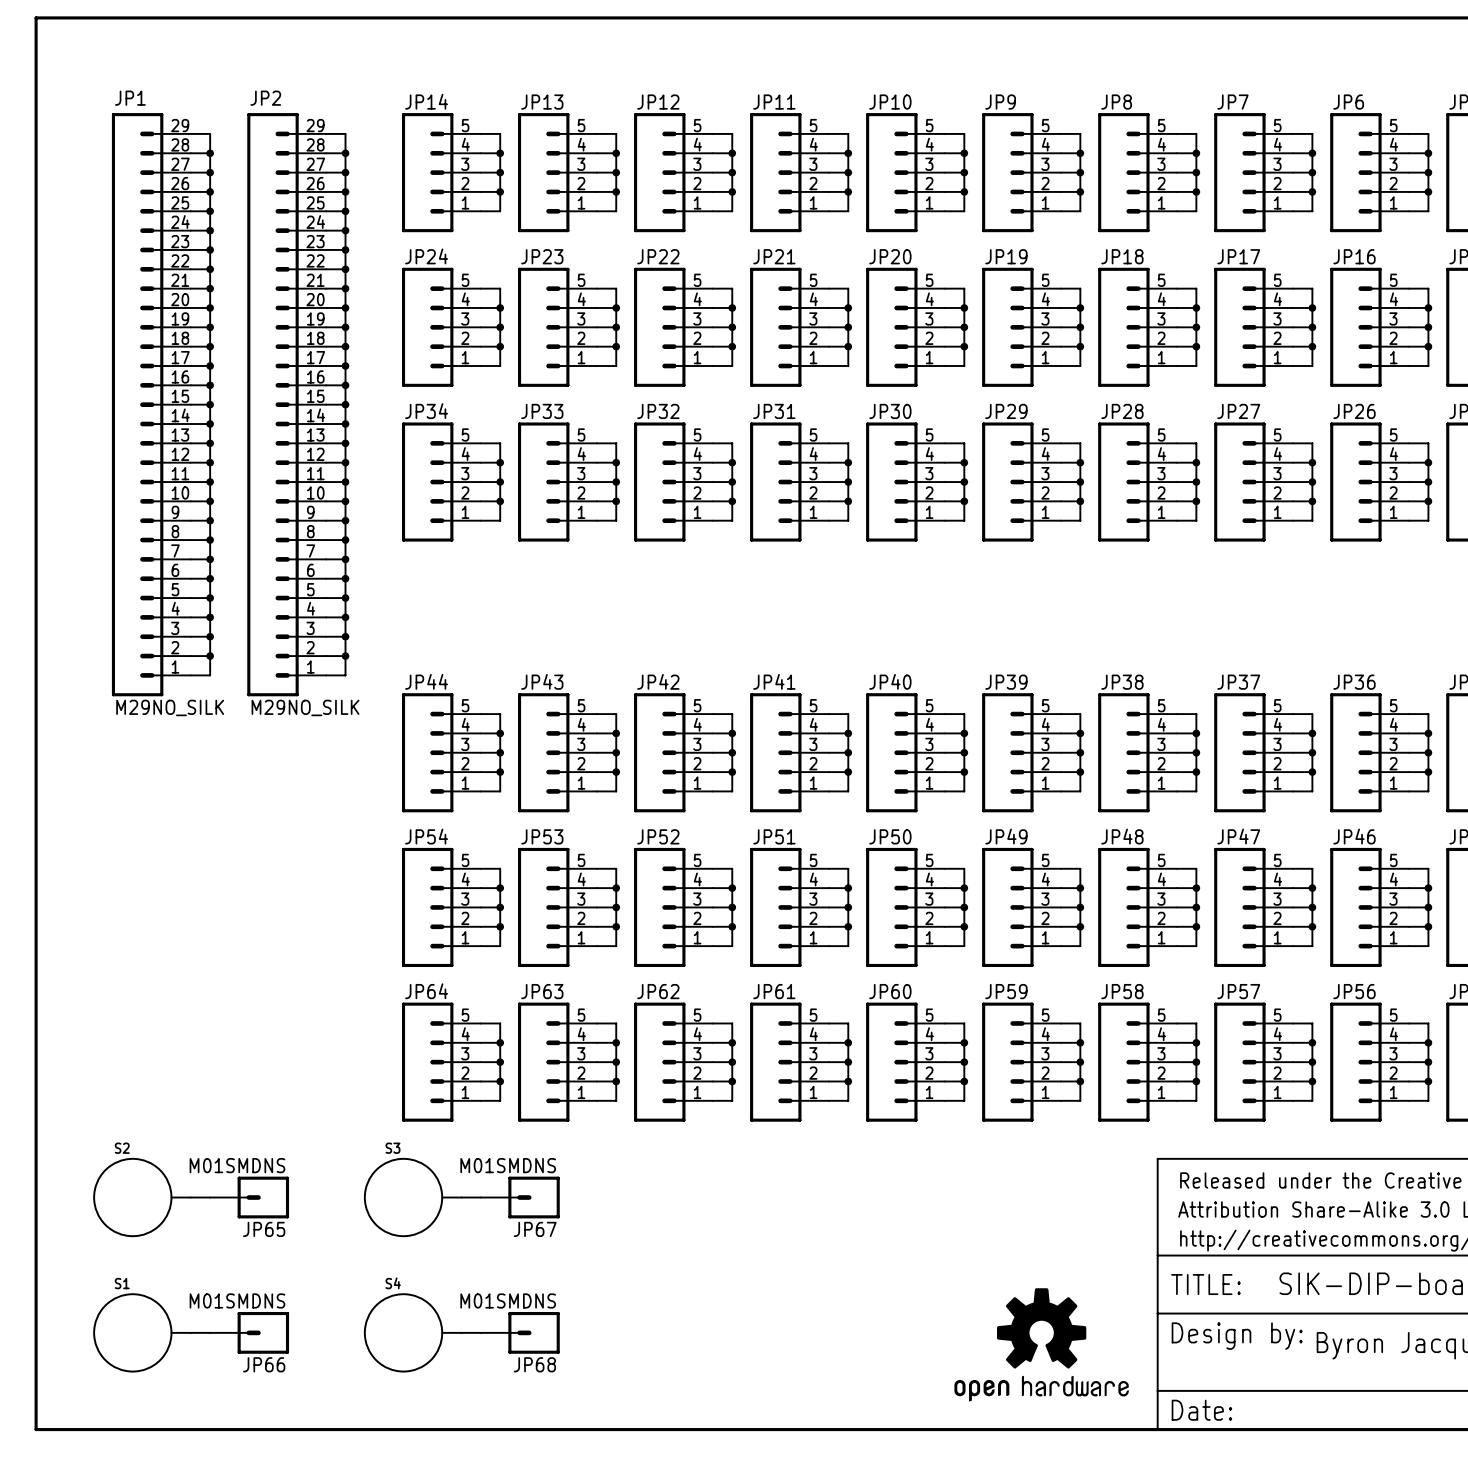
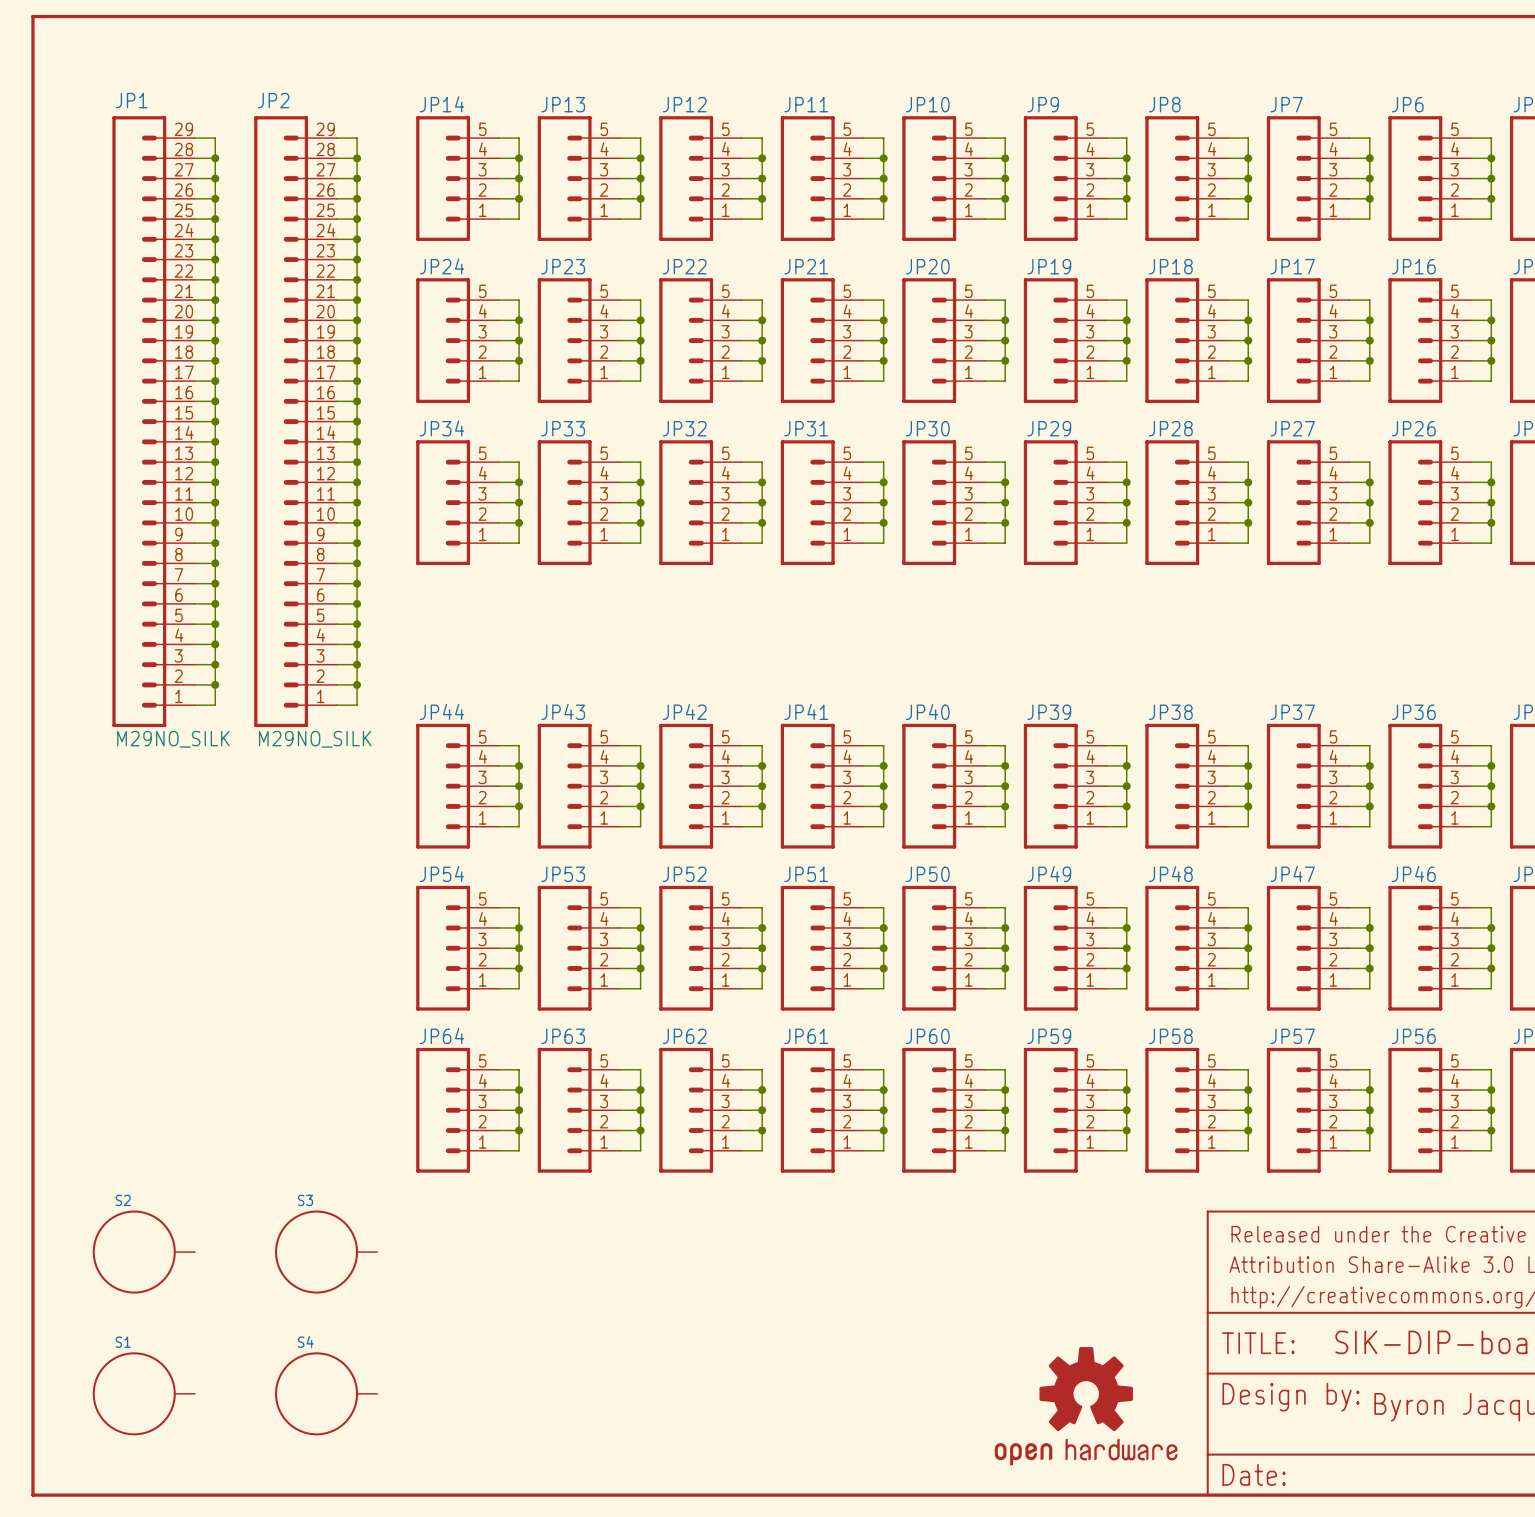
wire: (190, 1197) (210, 1197) -> none
JP65: M01SMDNS (249, 1197) -> none
S3 position: (412, 1197) -> (326, 1252)
wire: (461, 1197) (480, 1197) -> none
JP67: M01SMDNS (520, 1197) -> none
wire: (190, 1332) (210, 1332) -> none
JP66: M01SMDNS (249, 1332) -> none
S4 position: (412, 1332) -> (326, 1393)
wire: (461, 1332) (480, 1332) -> none
JP68: M01SMDNS (520, 1332) -> none

